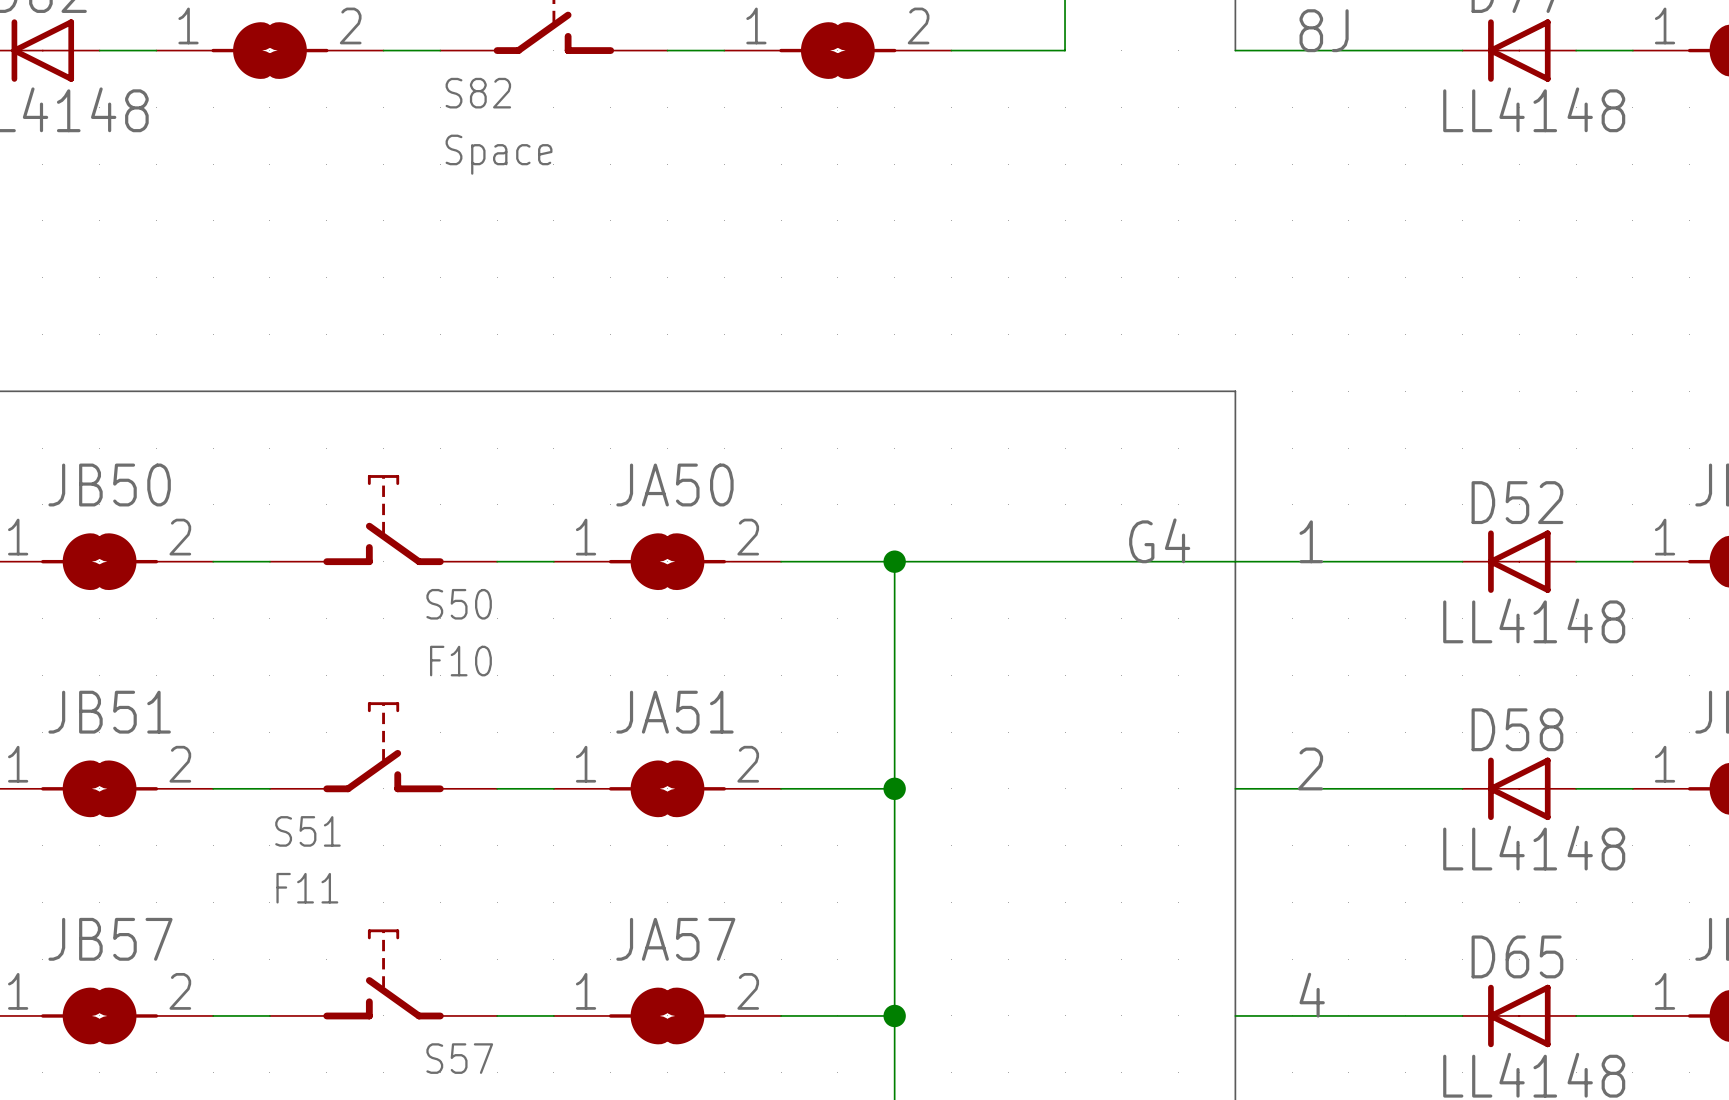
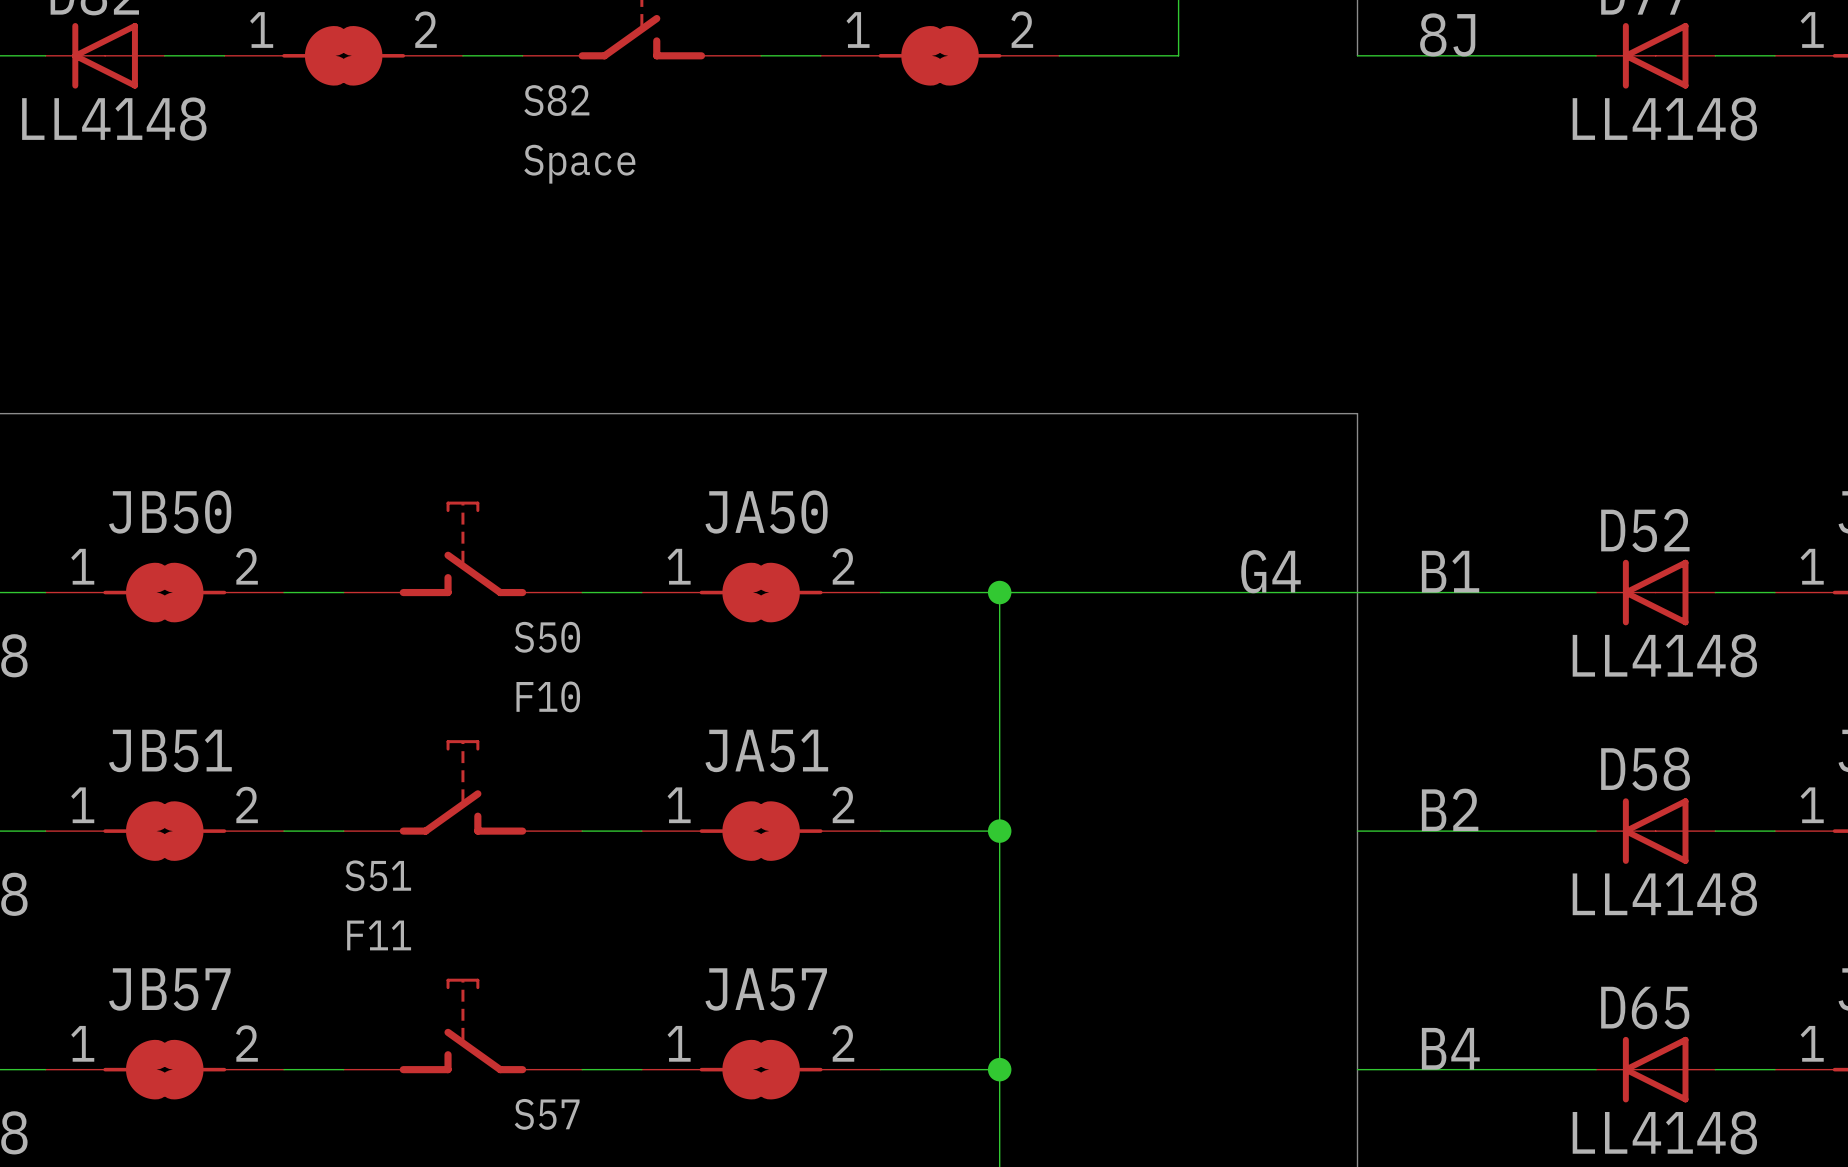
label: 1 (1311, 541) -> B1 (1450, 571)
label: 2 (1310, 768) -> B2 (1450, 809)
label: 4 (1312, 995) -> B4 (1450, 1048)

